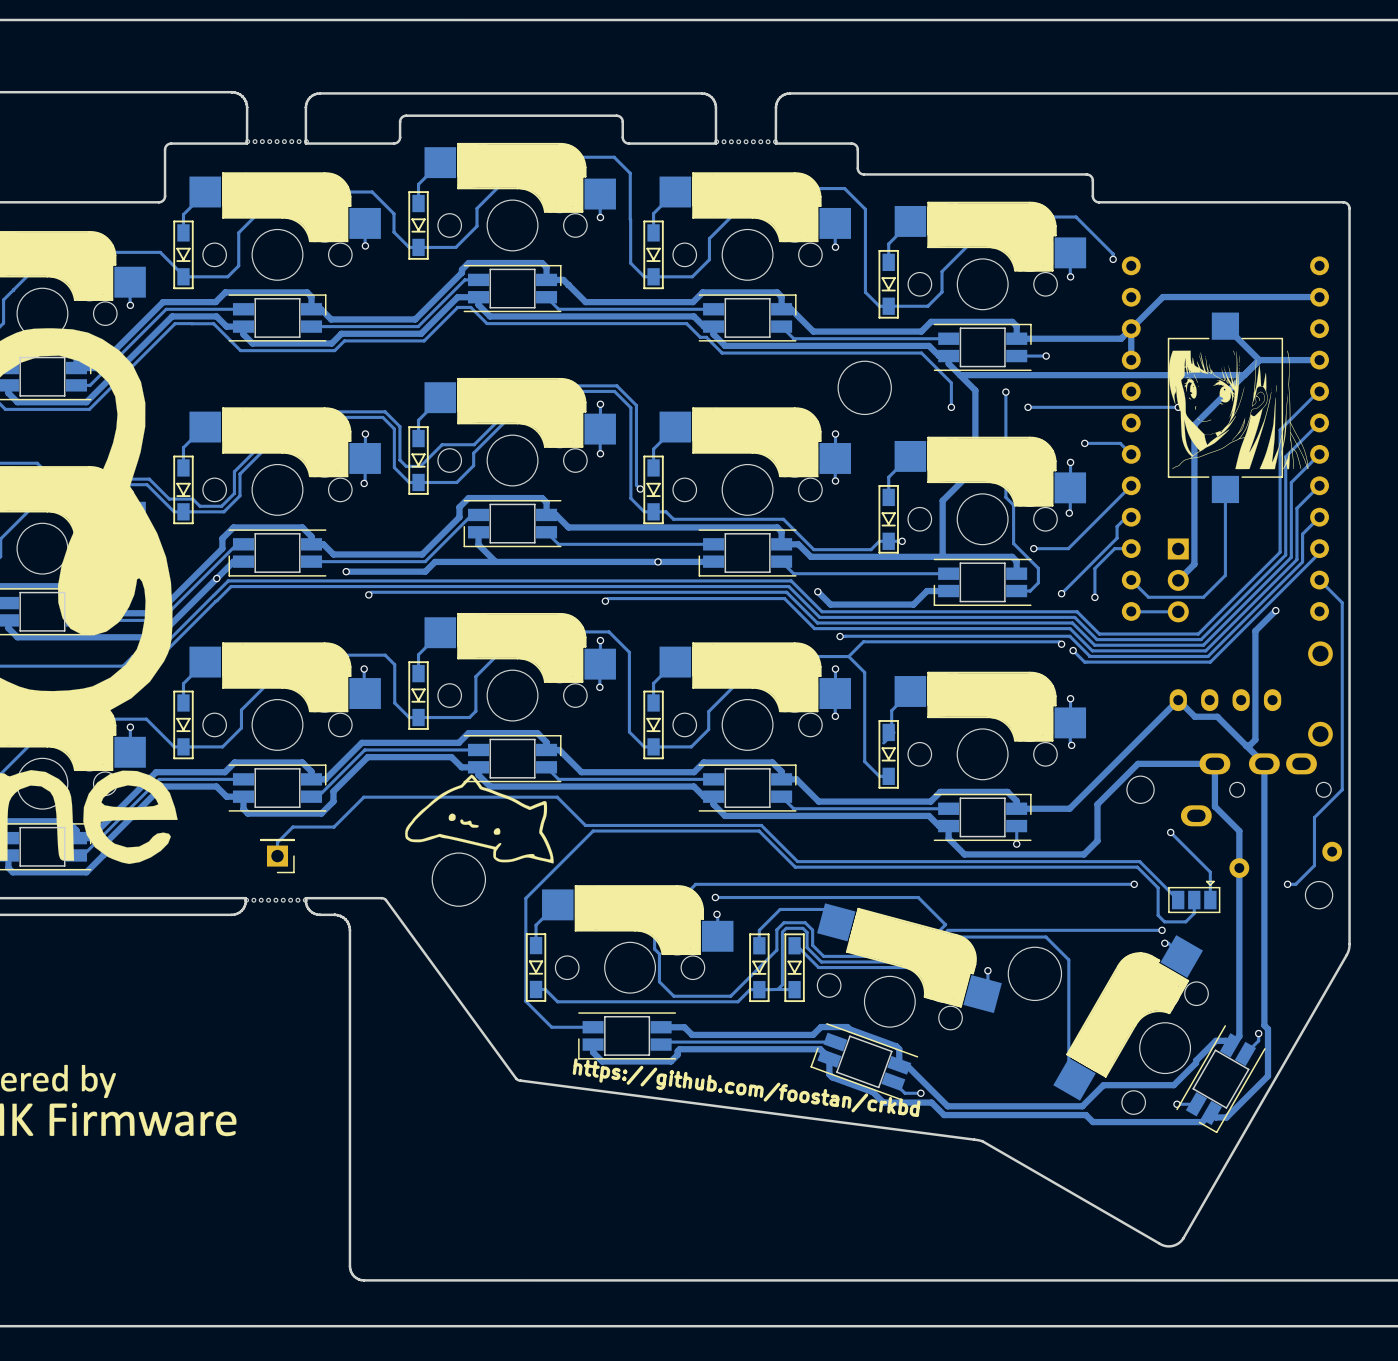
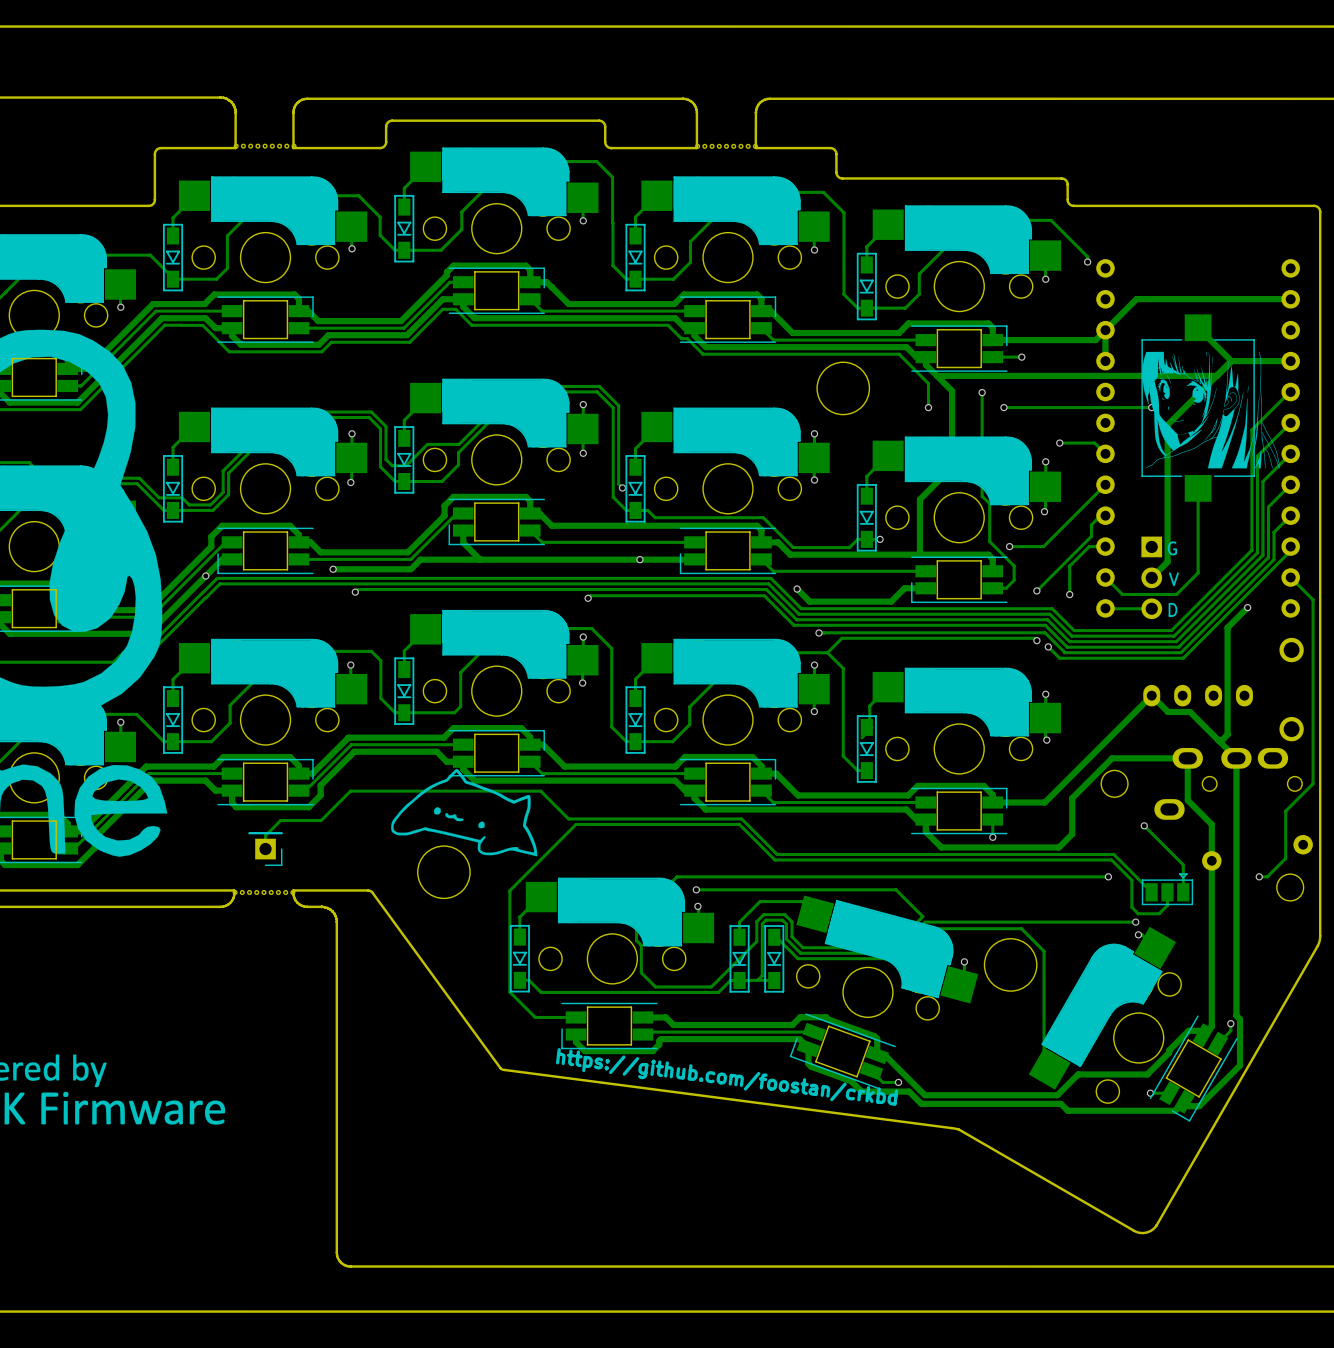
text: none -> G (1172, 548)
text: none -> V (1173, 579)
text: none -> D (1172, 609)

